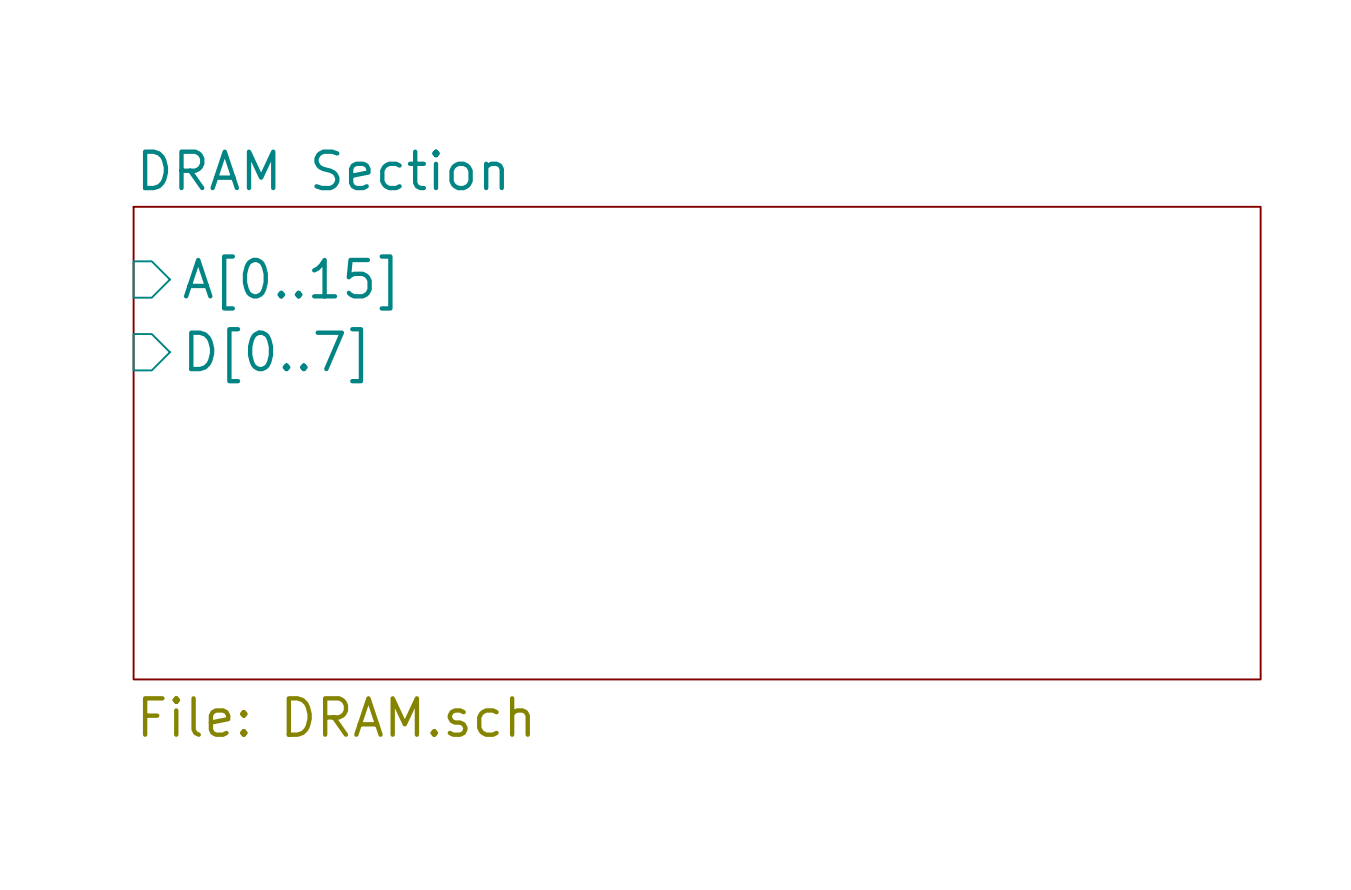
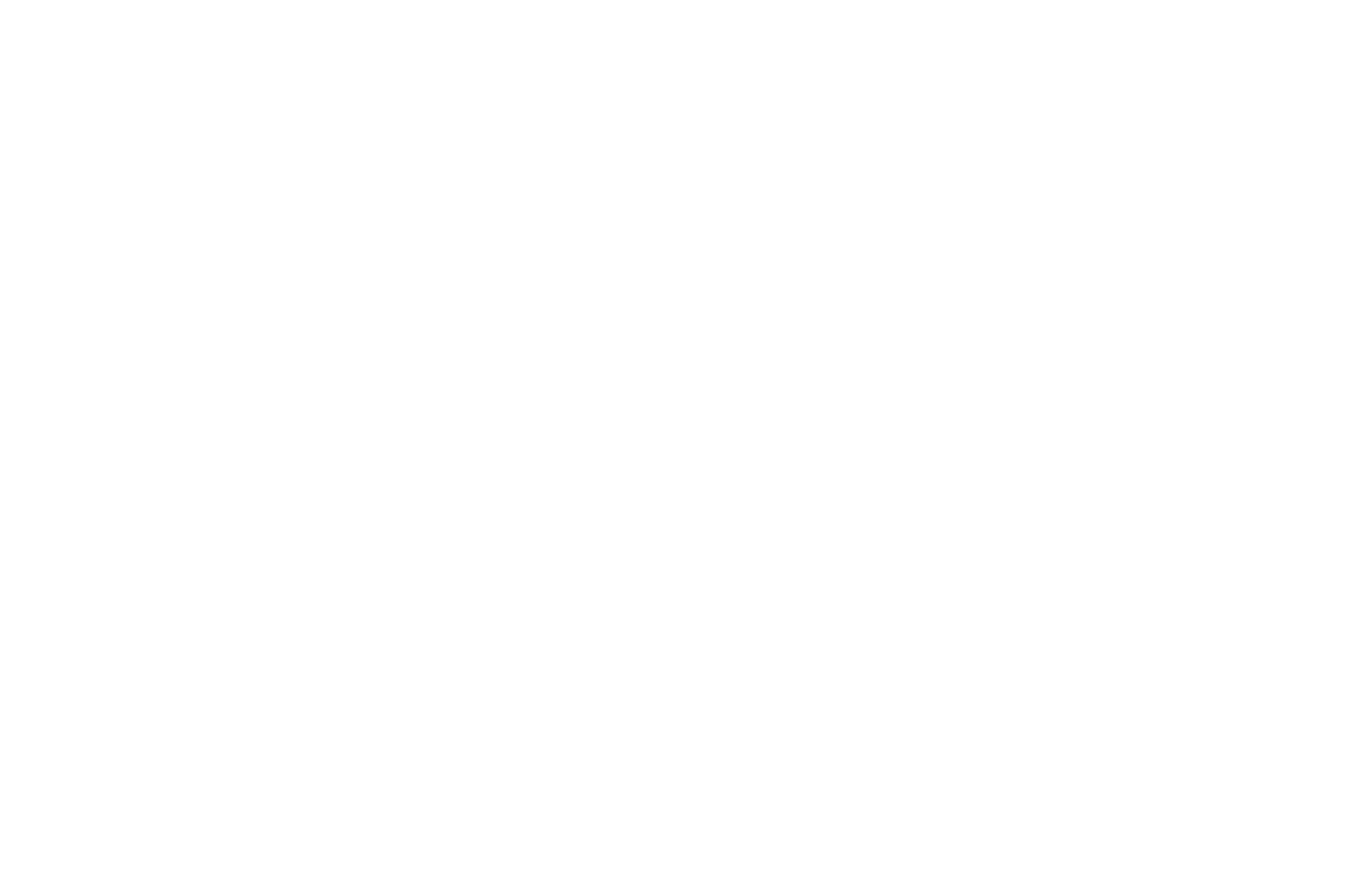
sheet pin: A[0..15] (288, 282) -> none
sheet pin: D[0..7] (276, 355) -> none
sheet DRAM Section: File: DRAM.sch (697, 443) -> none

